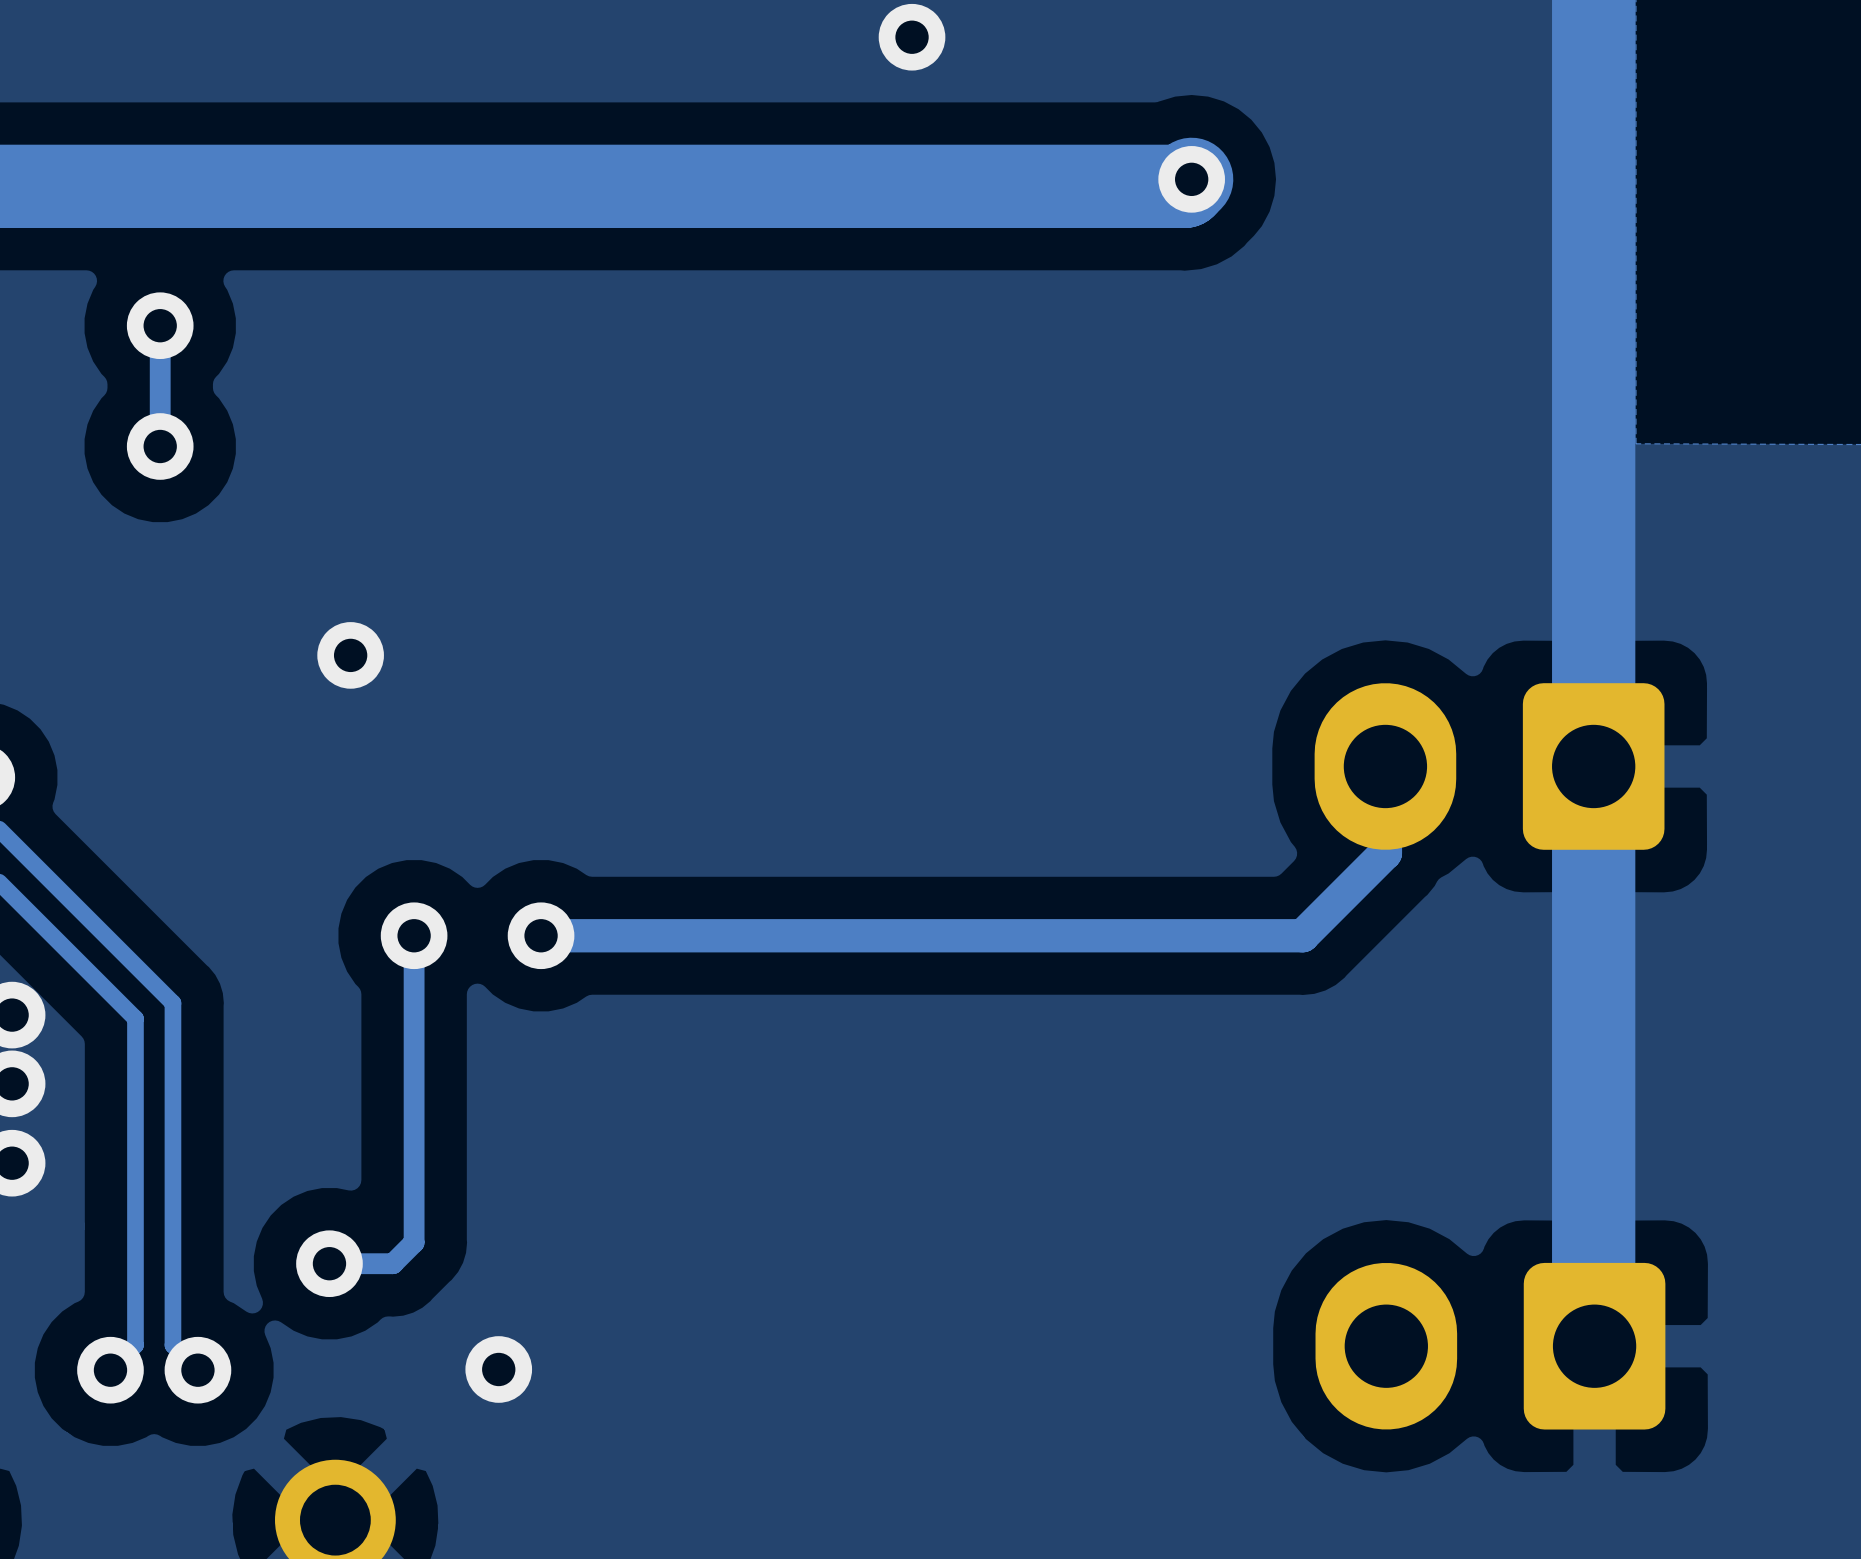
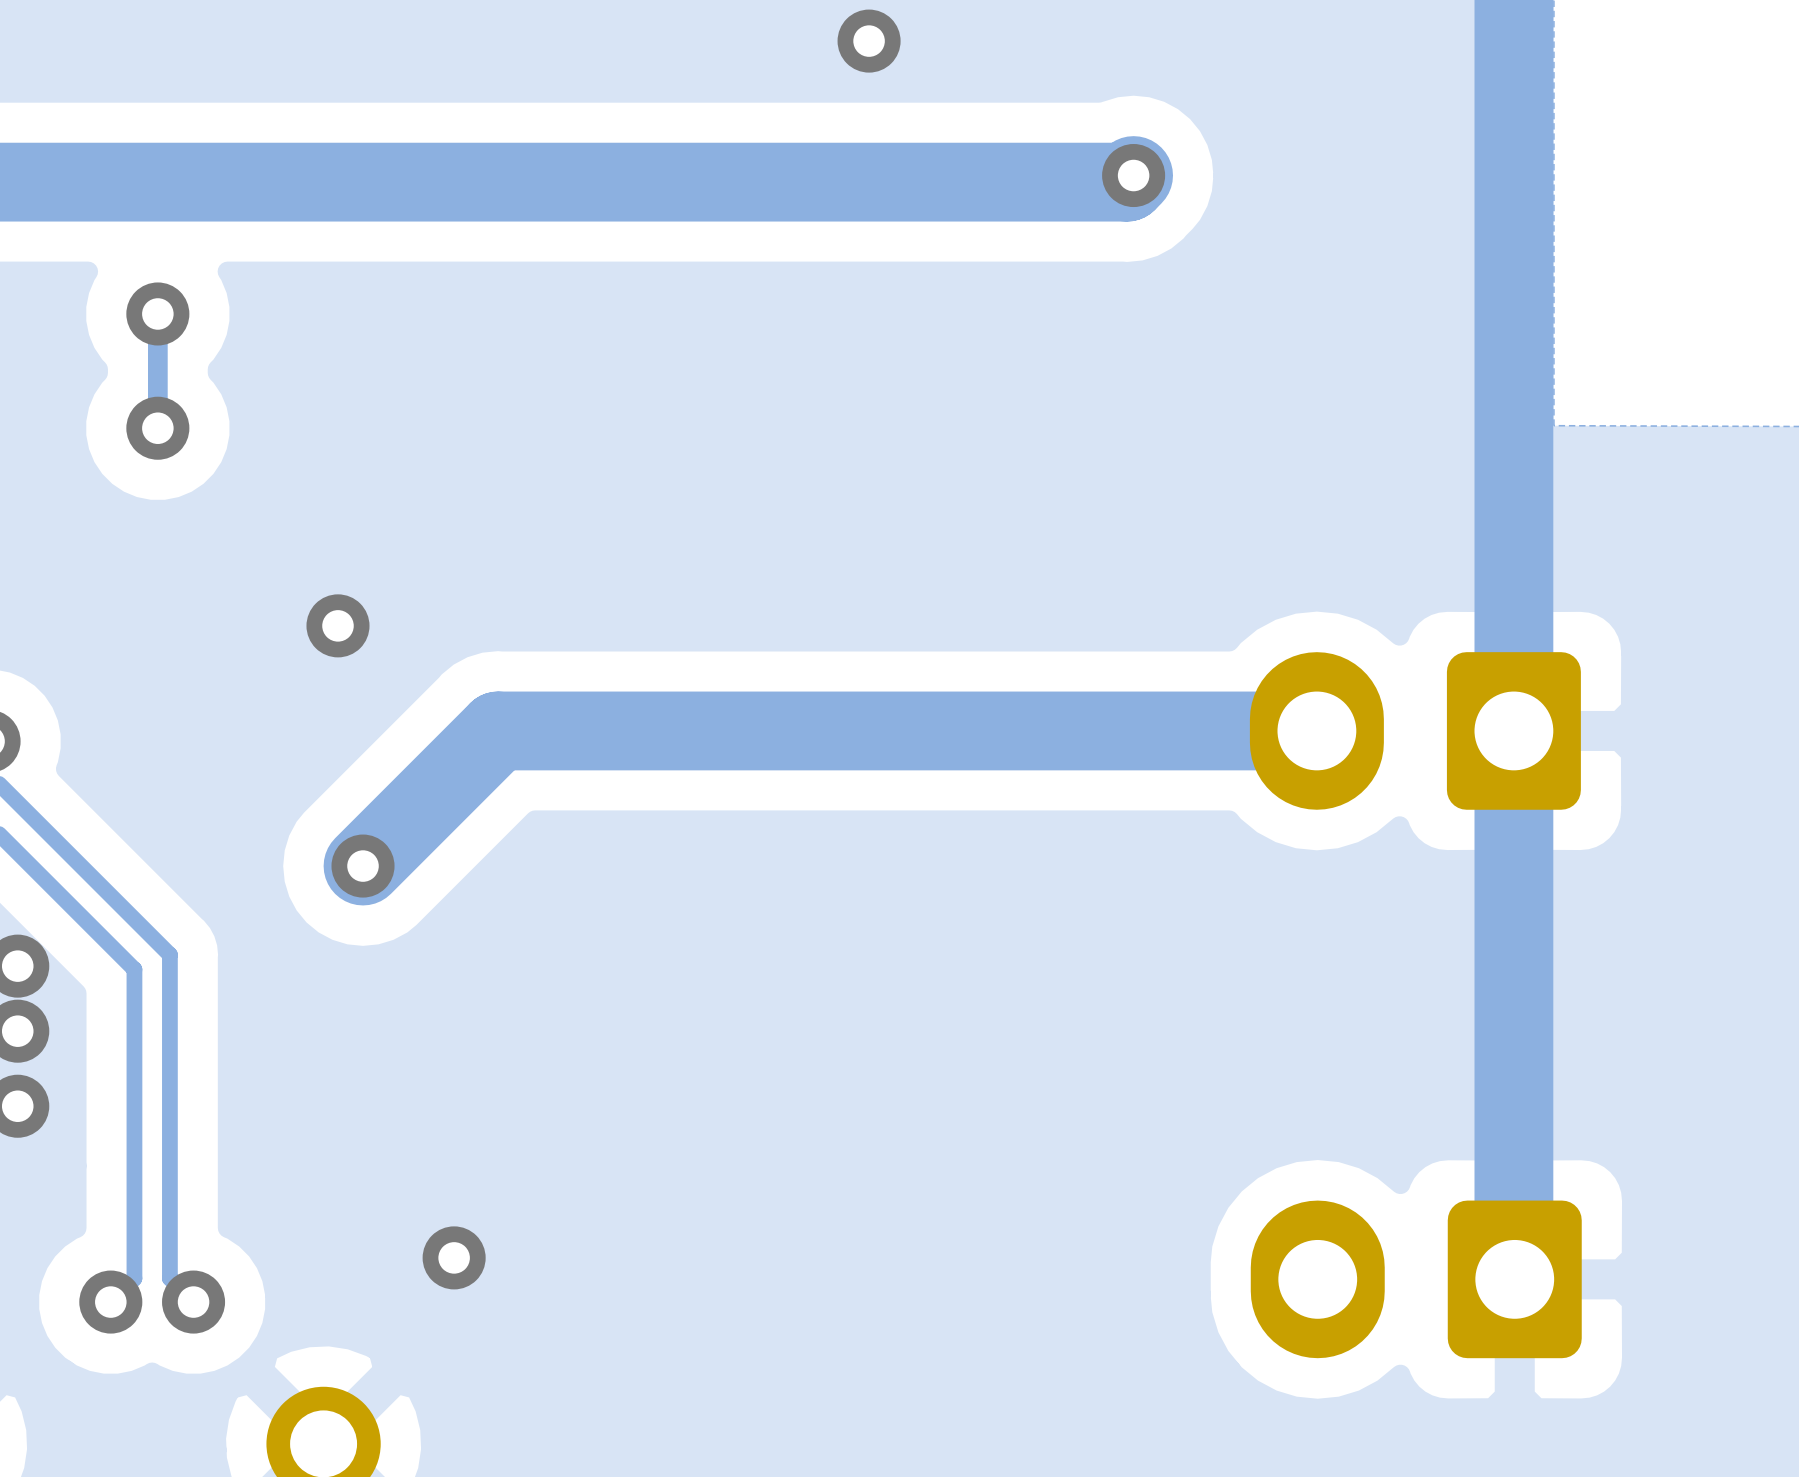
track: (1385, 766) (1385, 853) (1302, 935) (541, 935) -> (1316, 730) (498, 730) (363, 866)
track: (414, 935) (414, 1242) (392, 1263) (329, 1263) -> none
via position: (414, 935) -> (363, 866)
via: (541, 935) -> none
via: (329, 1263) -> none
via position: (498, 1369) -> (454, 1257)

